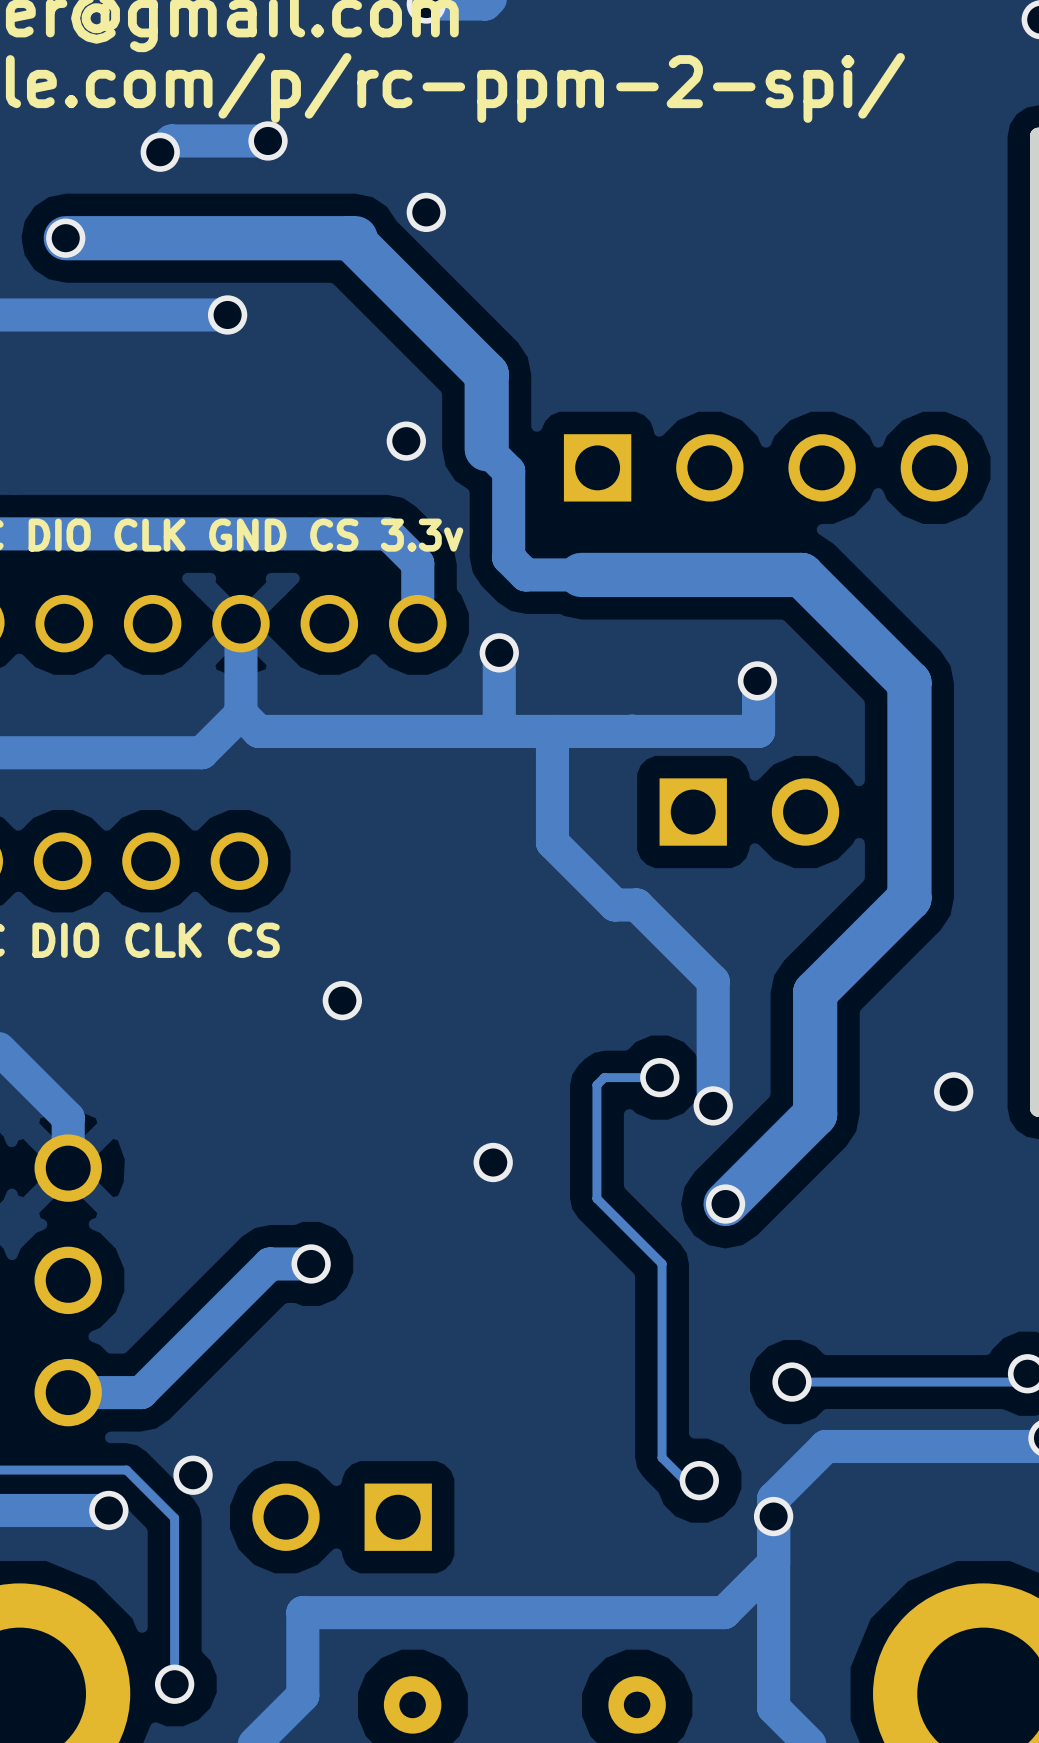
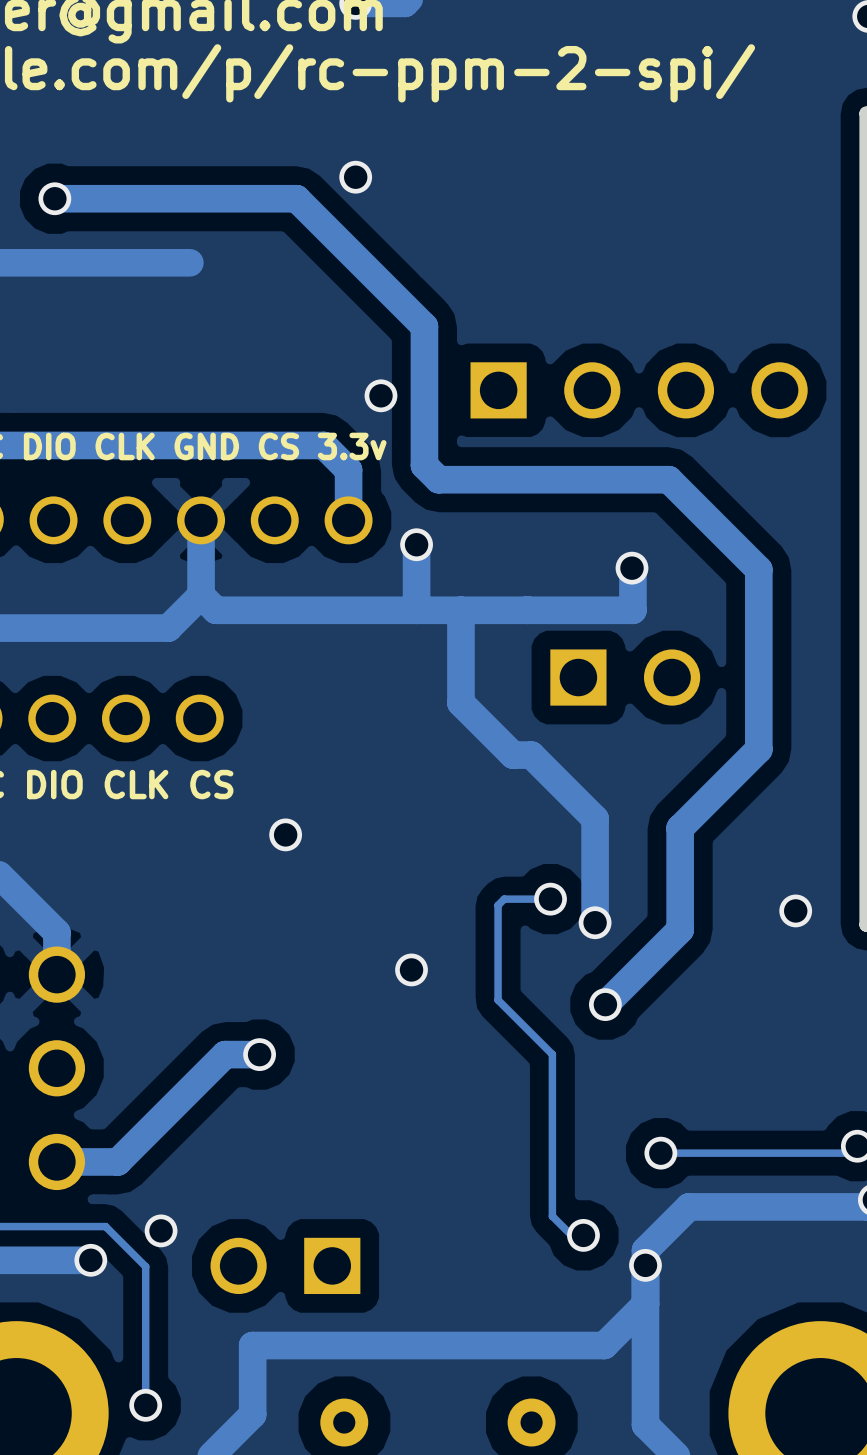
track: (268, 140) (171, 140) (160, 152) -> none
via: (268, 140) -> none
via: (160, 152) -> none
track: (350, 238) (486, 374) (486, 449) (508, 471) -> (296, 198) (424, 326) (424, 393)
track width: thick (355, 238) (65, 238) -> thin (296, 198) (54, 198)
via: (227, 314) -> none
via position: (406, 441) -> (380, 395)
track width: thick (580, 574) (801, 574) (909, 682) (909, 898) (815, 992) (815, 1114) (725, 1204) -> thin (484, 479) (668, 479) (758, 569) (758, 749) (680, 828) (680, 929) (605, 1004)

